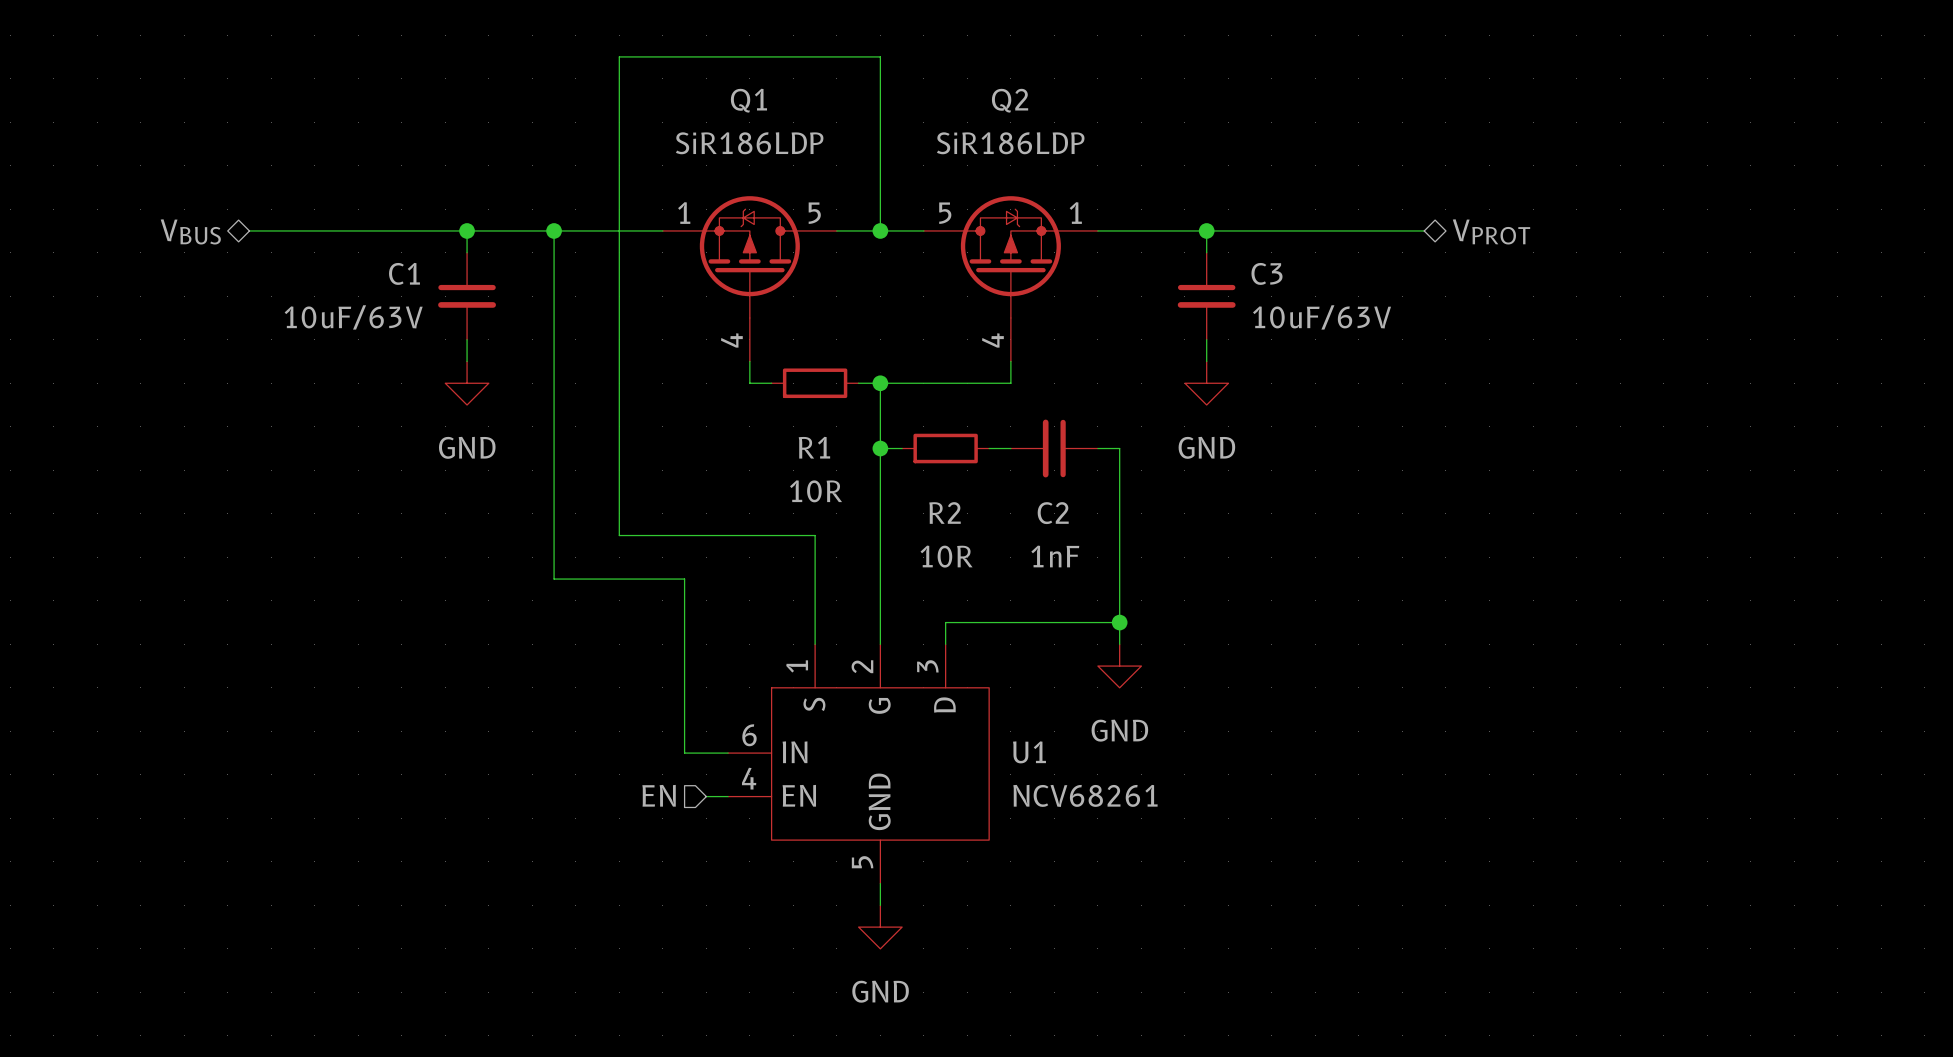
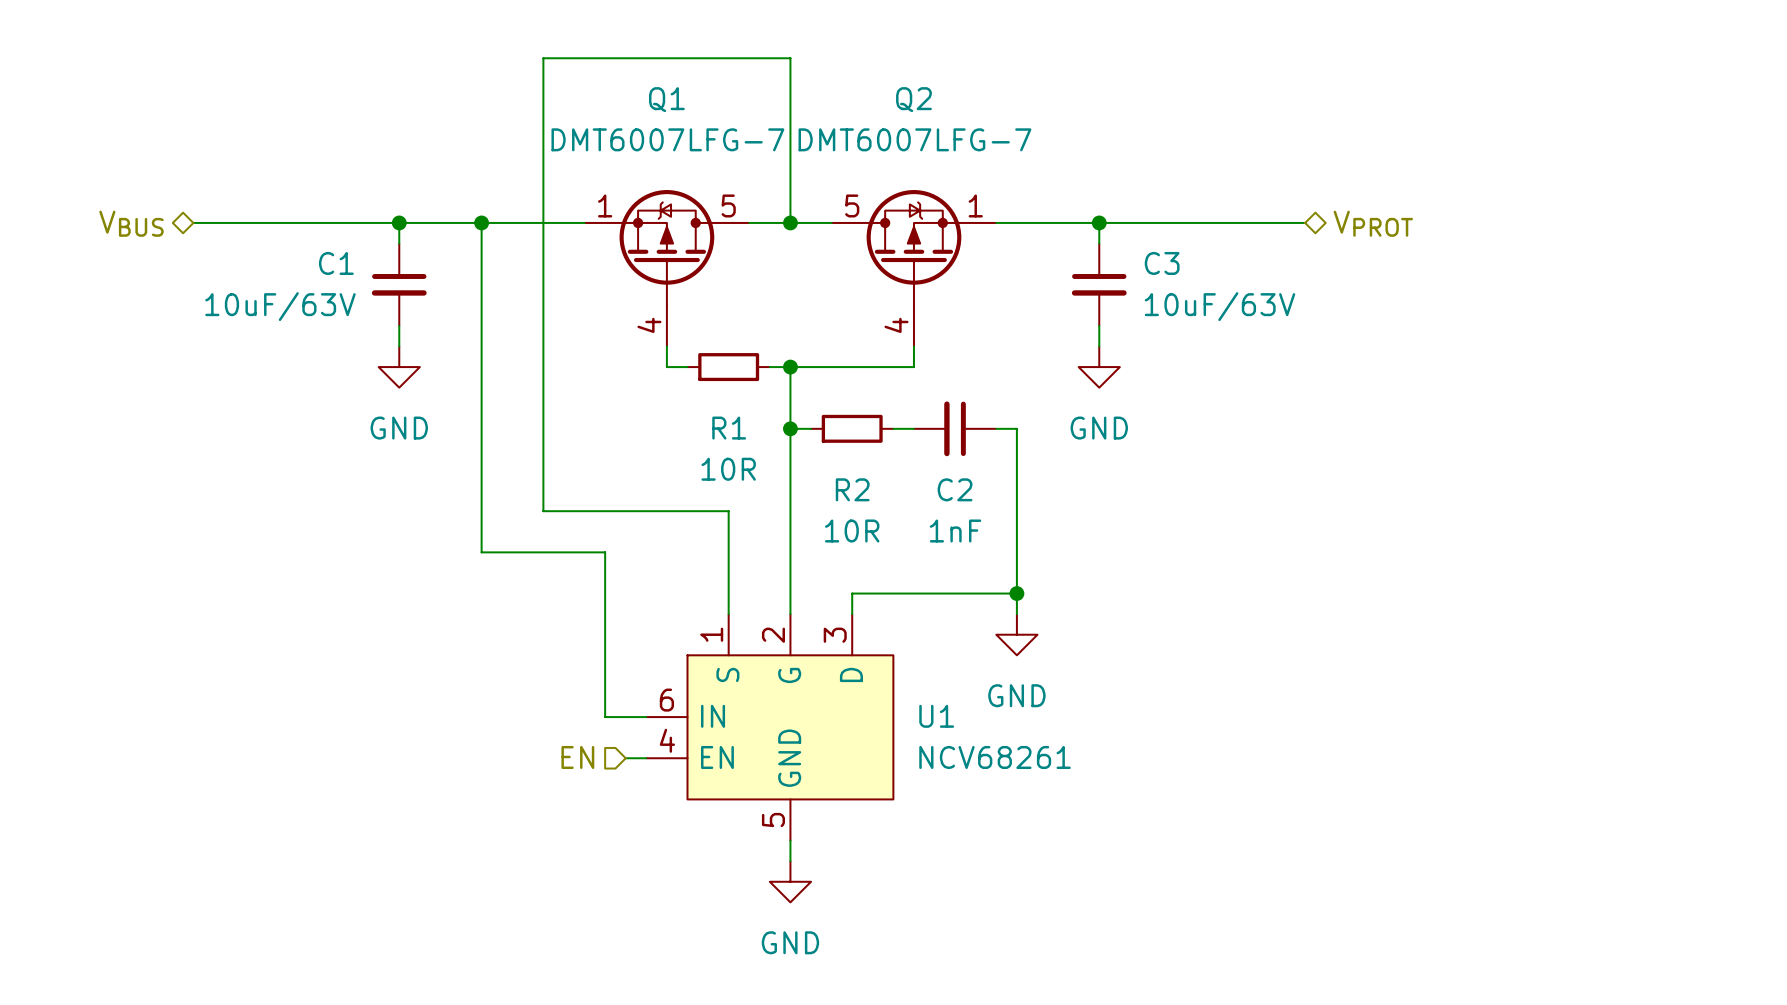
Q1 value: SiR186LDP (749, 143) -> DMT6007LFG-7 (667, 139)
Q2 value: SiR186LDP (1010, 143) -> DMT6007LFG-7 (914, 139)

